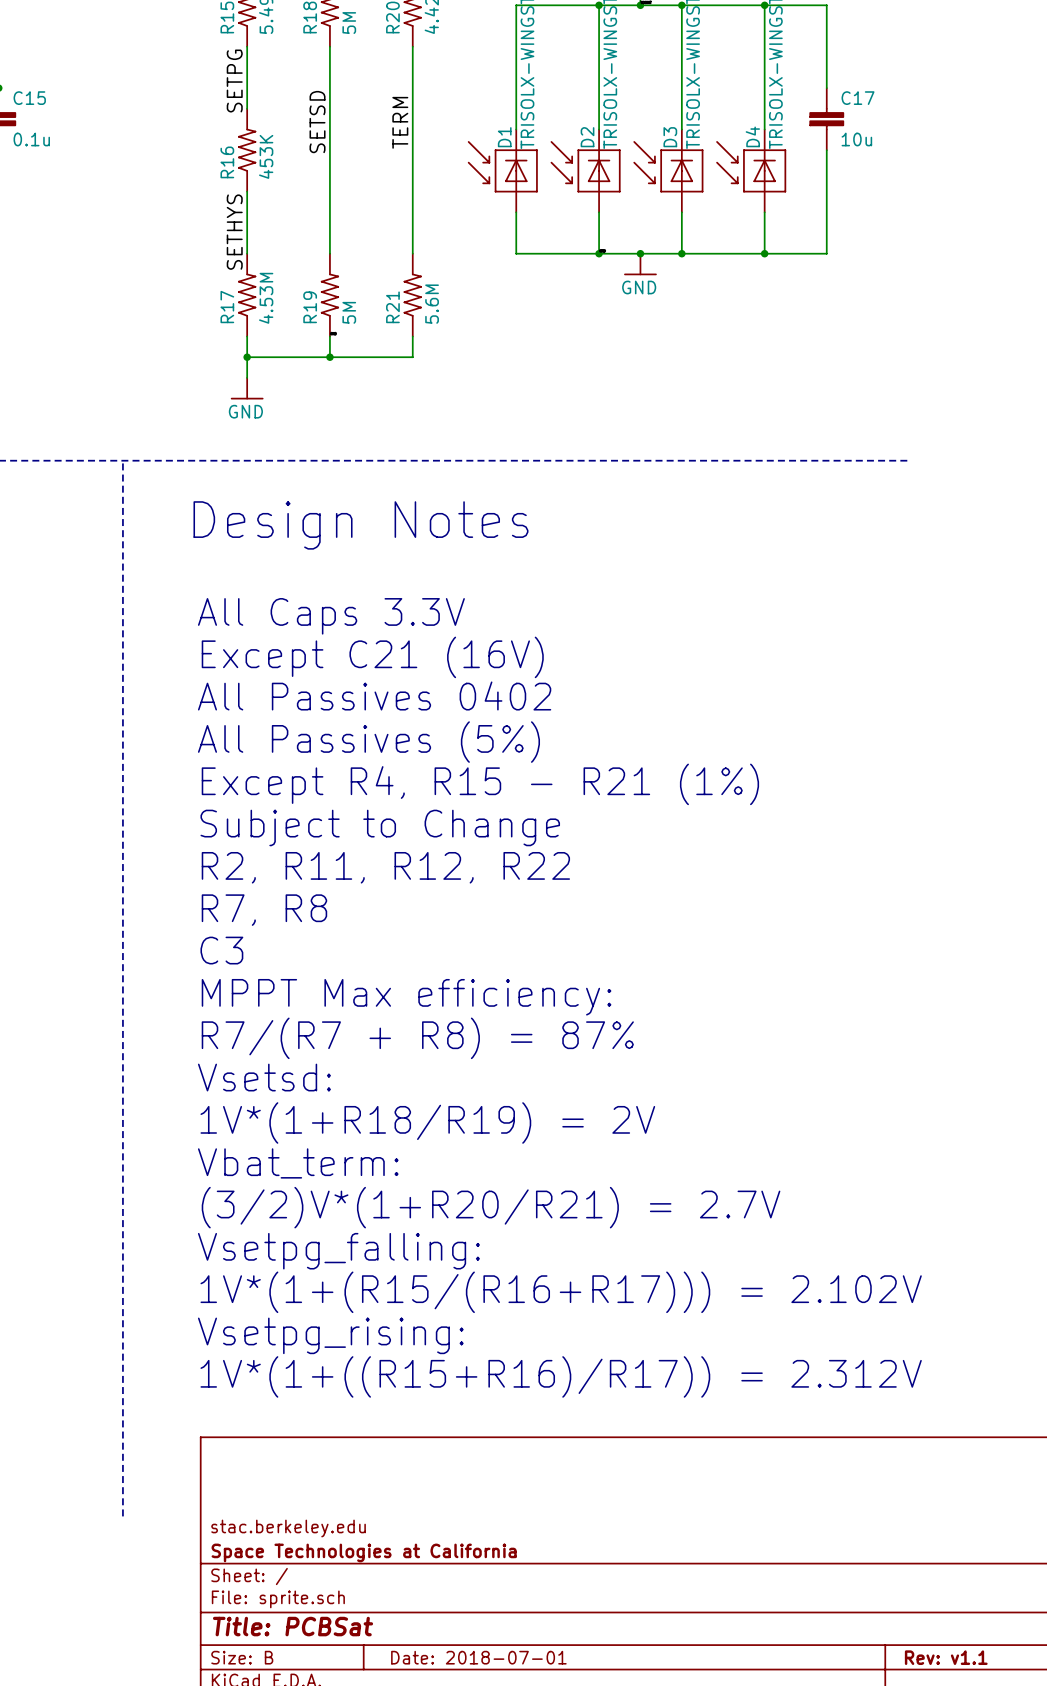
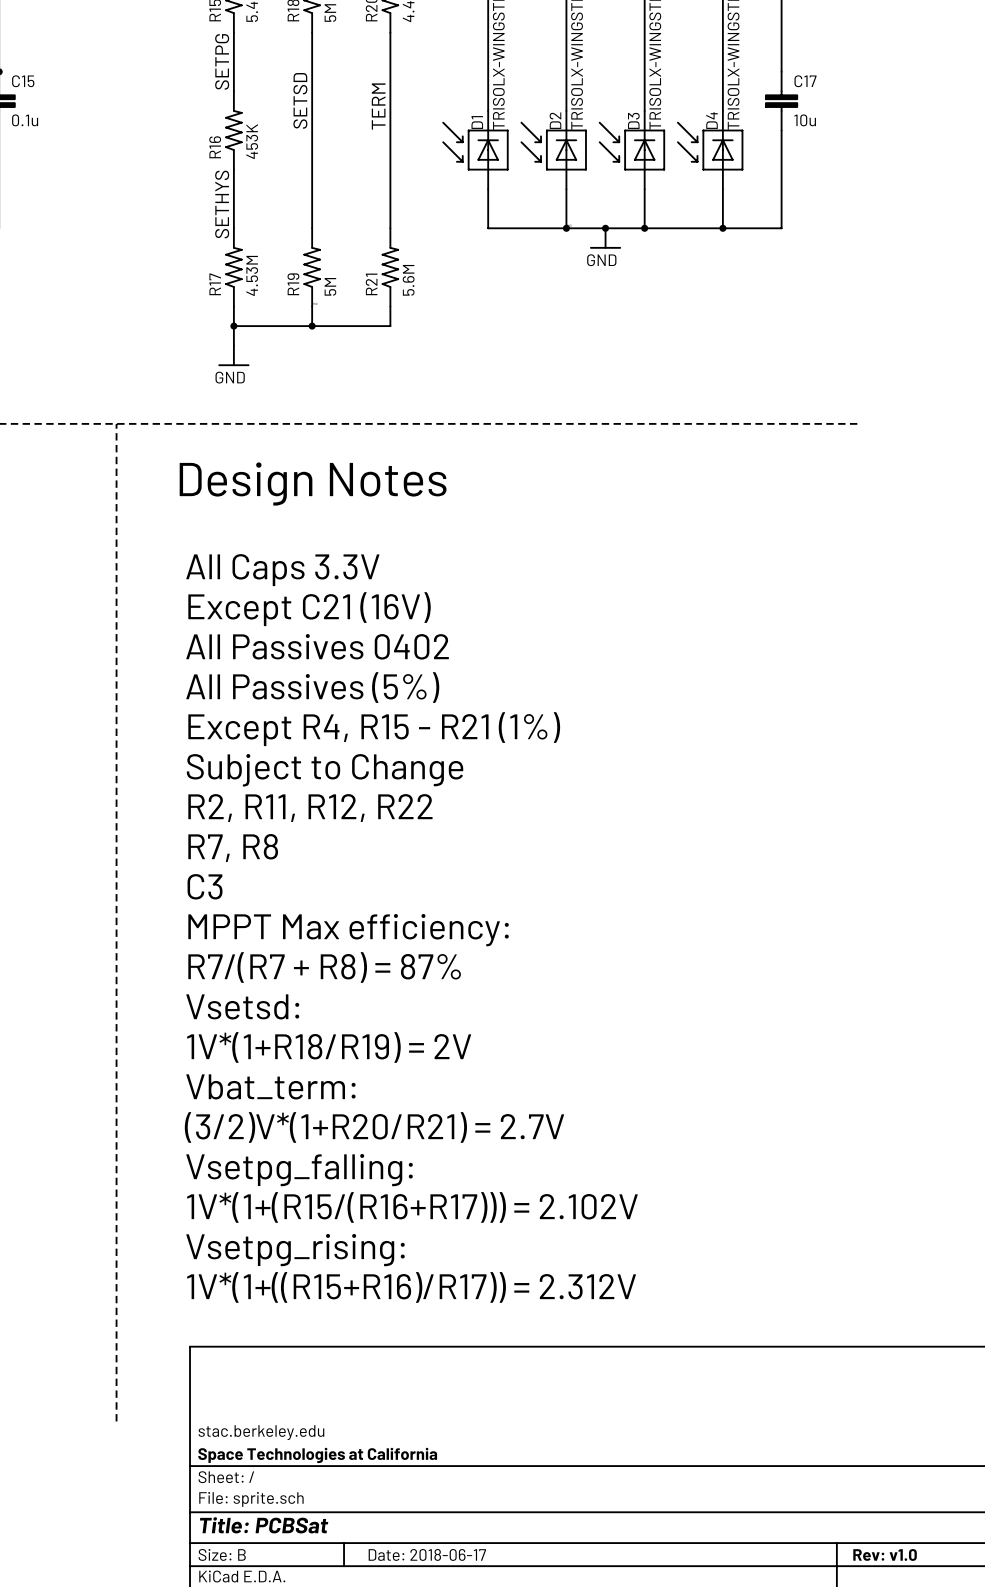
title block: Date: 2018-07-01 (478, 1657) -> Date: 2018-06-17 (427, 1554)
title block: Rev: v1.1 (946, 1657) -> Rev: v1.0 (885, 1554)

